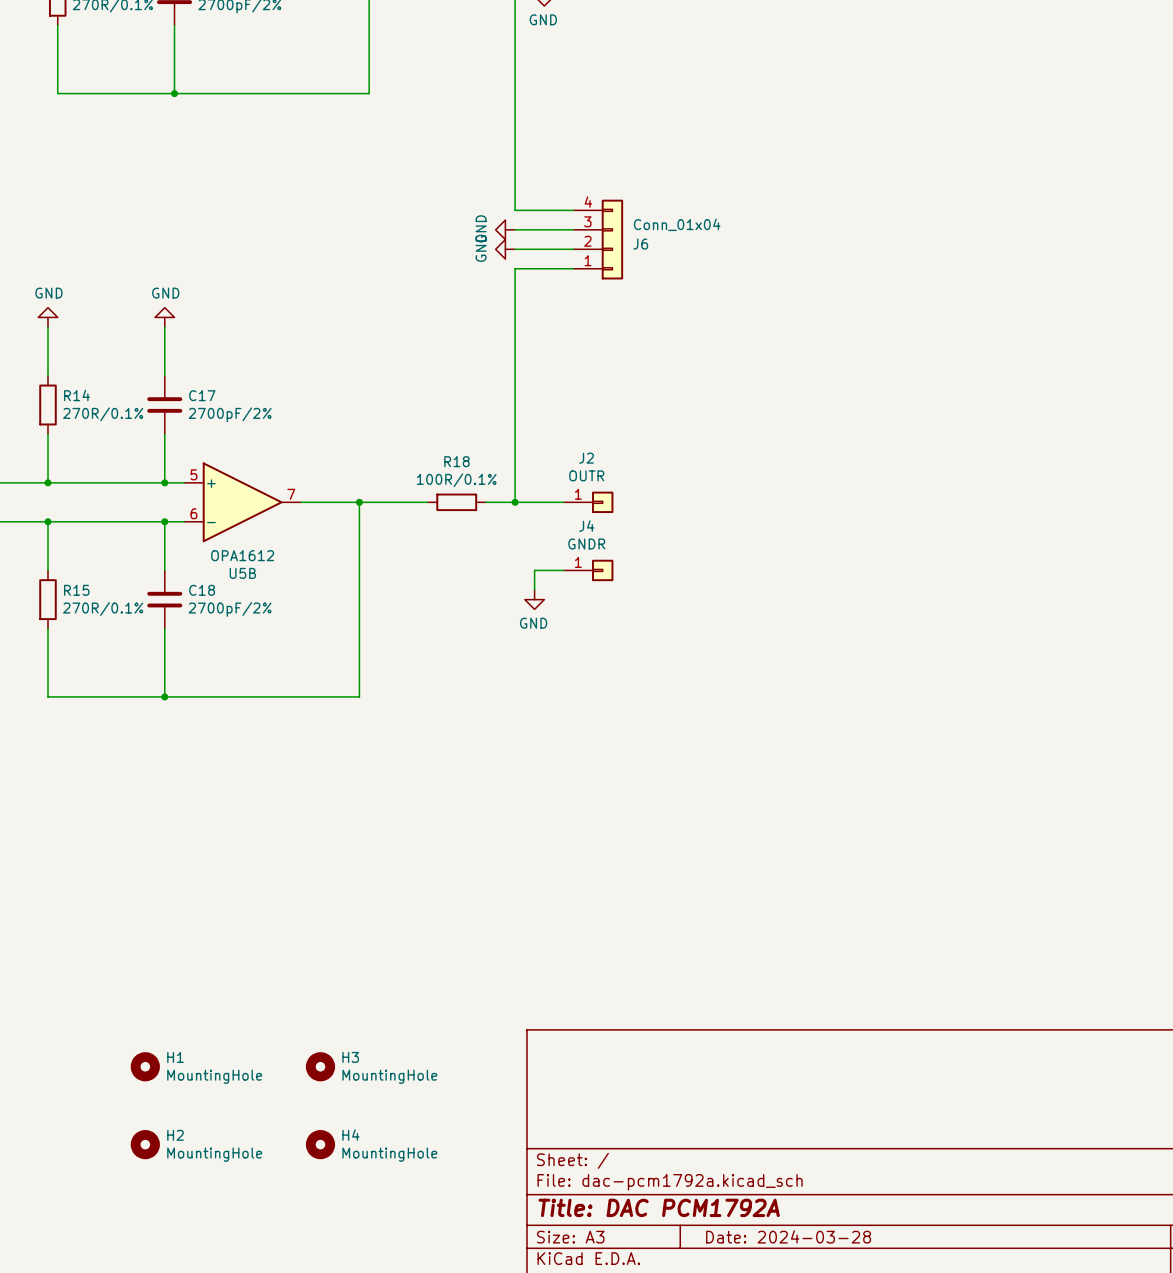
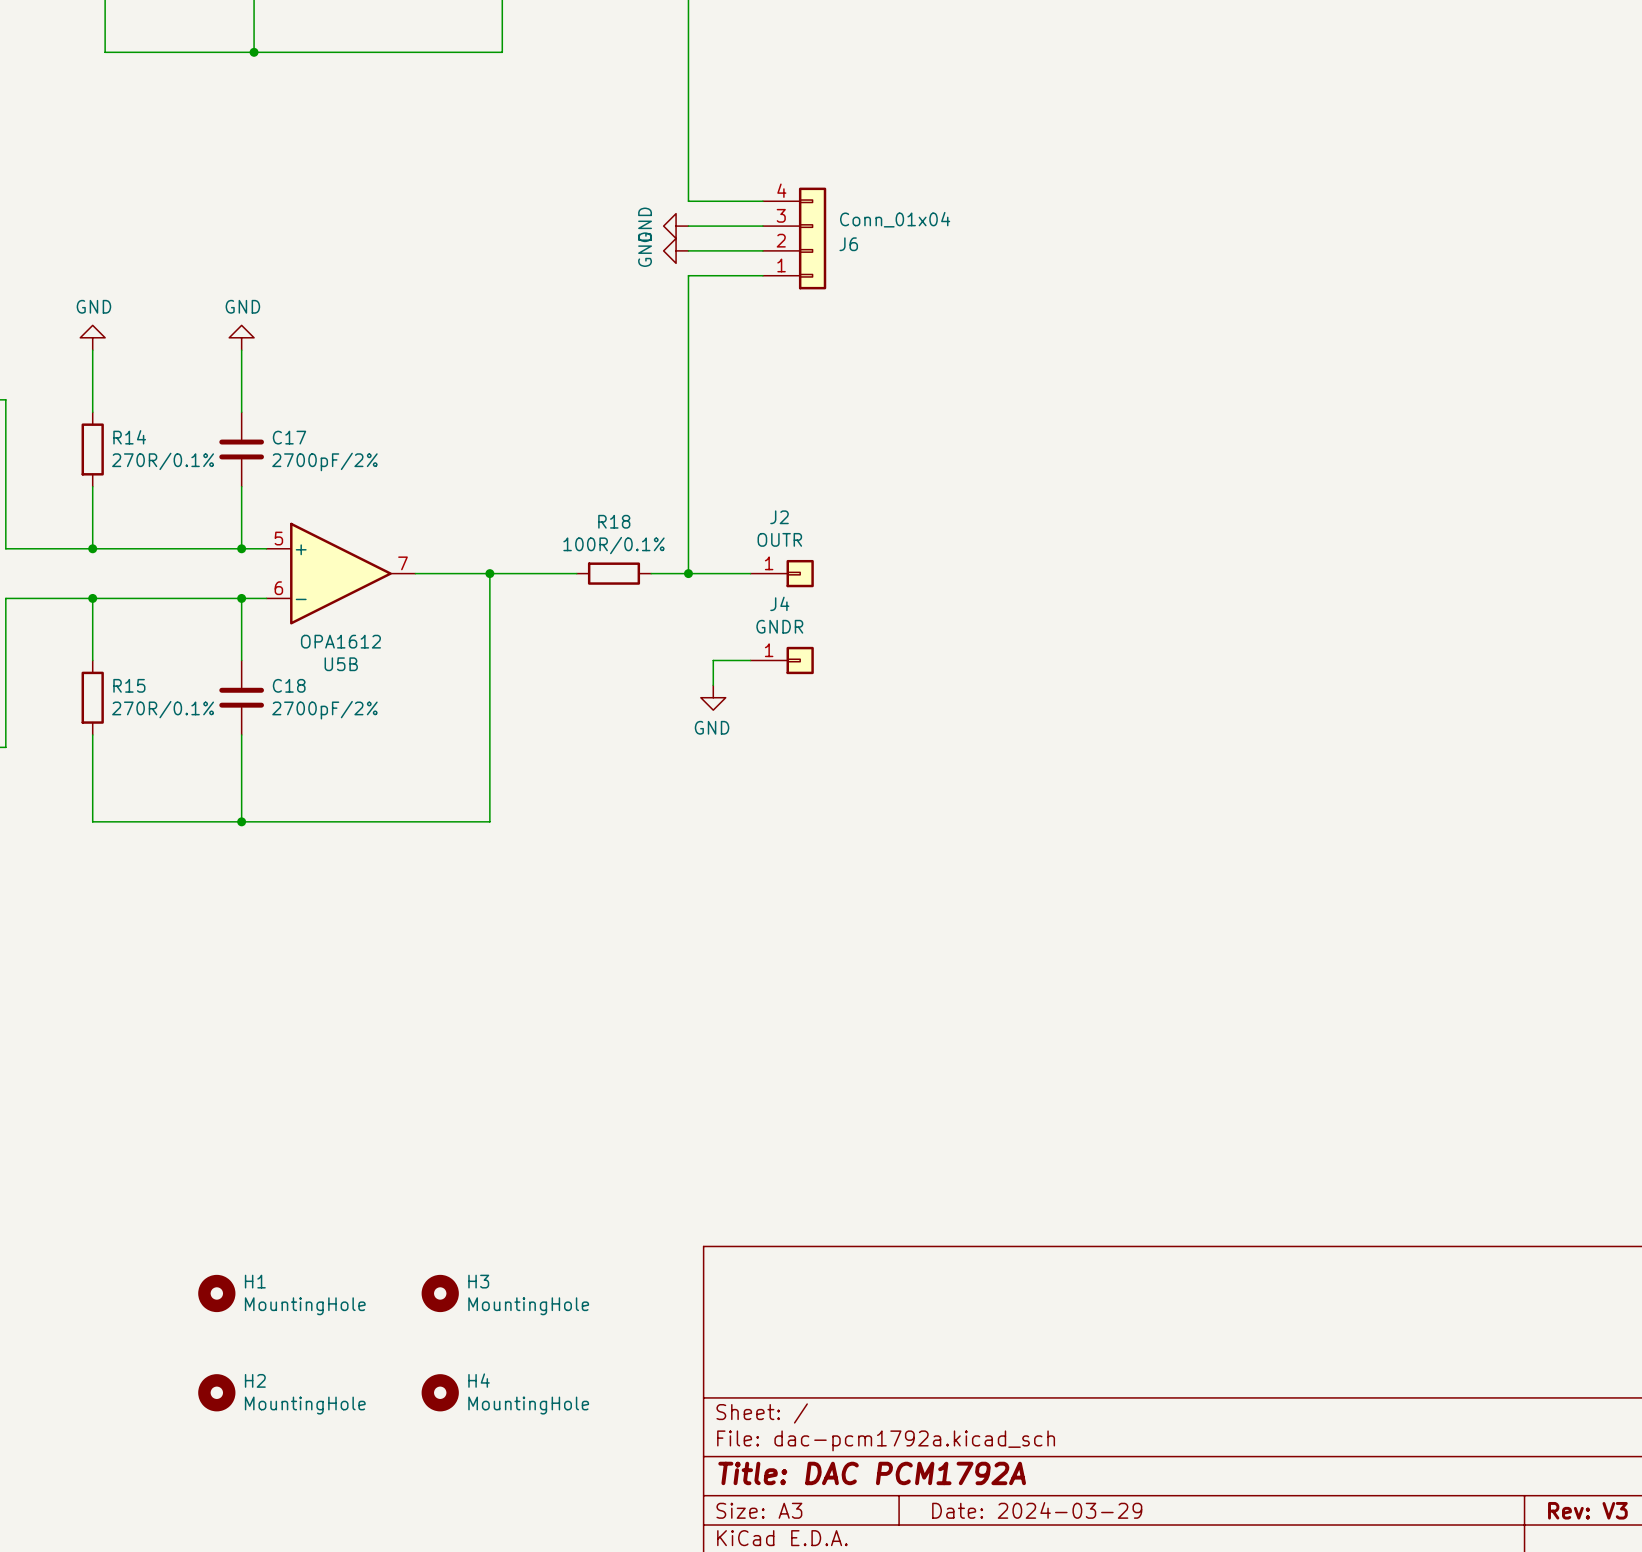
title block: Date: 2024-03-28 (788, 1236) -> Date: 2024-03-29 (1037, 1510)

